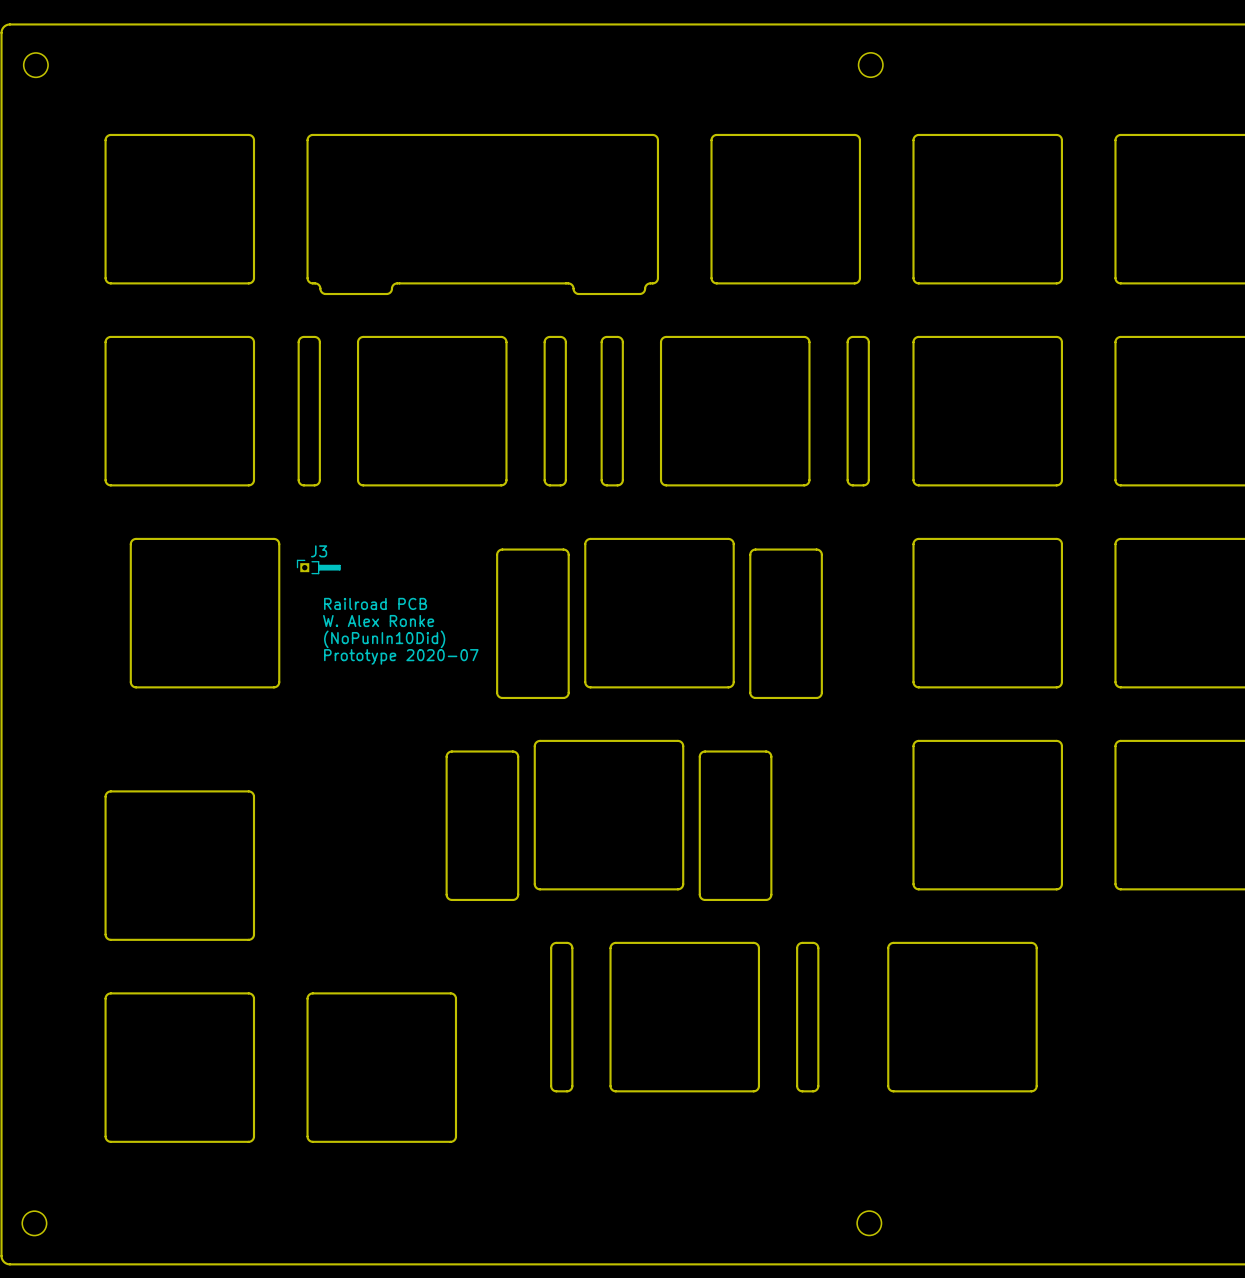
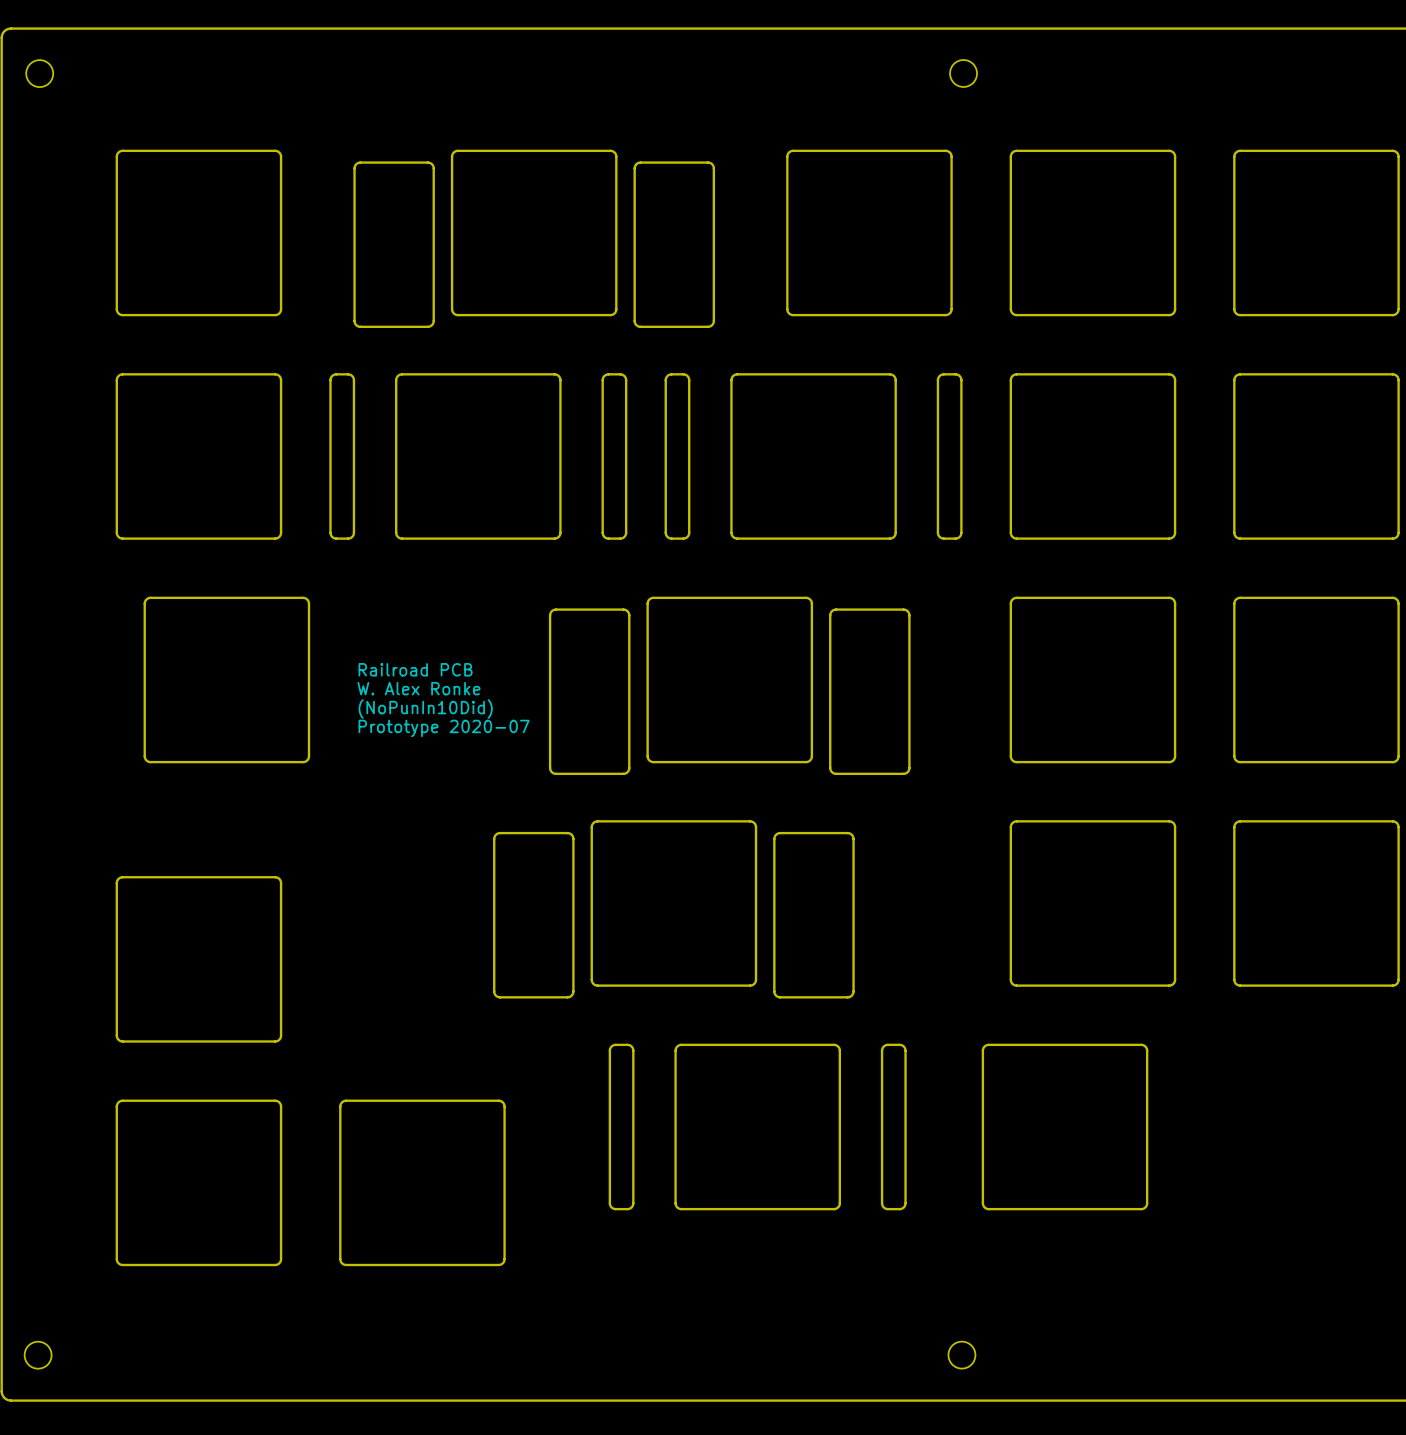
board edge: (413, 134) (312, 134) (308, 137) (307, 278) (310, 282) (318, 284) (320, 288) -> (457, 150) (453, 152) (452, 156) (452, 309) (453, 313) (457, 315)
board edge: (551, 134) (652, 134) (657, 137) (657, 278) (655, 282) (647, 284) (645, 288) -> (610, 150) (614, 152) (616, 156) (616, 309) (614, 313) (610, 315)
board edge: (413, 283) (395, 283) (391, 288) -> (354, 320) (354, 168) (356, 164) (360, 162) (427, 162) (433, 166) (433, 320)
board edge: (551, 283) (569, 283) (573, 288) -> (713, 320) (713, 168) (712, 164) (707, 162) (640, 162) (635, 166) (634, 320)
J3: (318, 566) -> none

